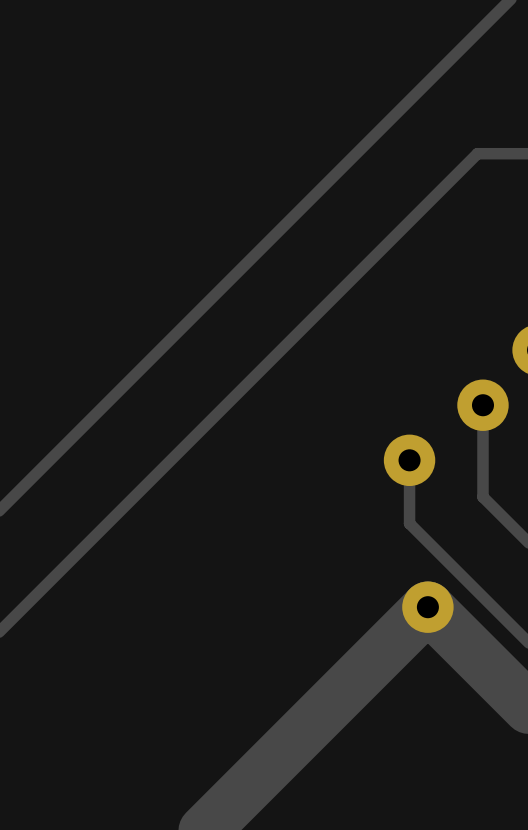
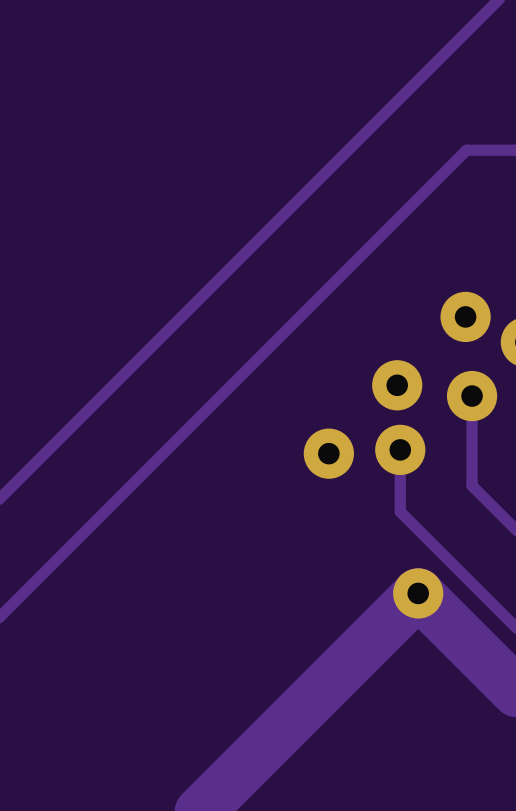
via: none -> (465, 316)
via: none -> (397, 385)
via: none -> (328, 453)

